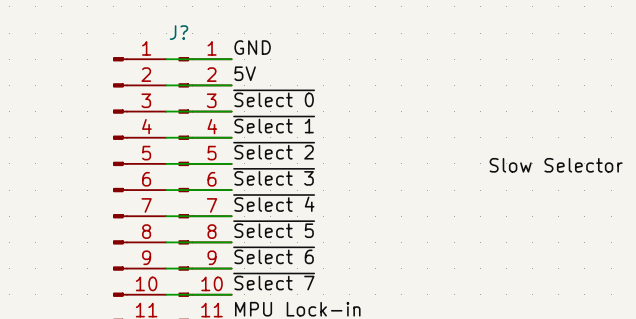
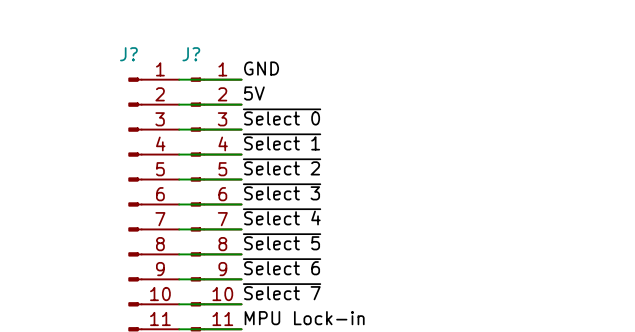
J? name: none -> J? (128, 54)
label: Slow Selector (556, 165) -> none

